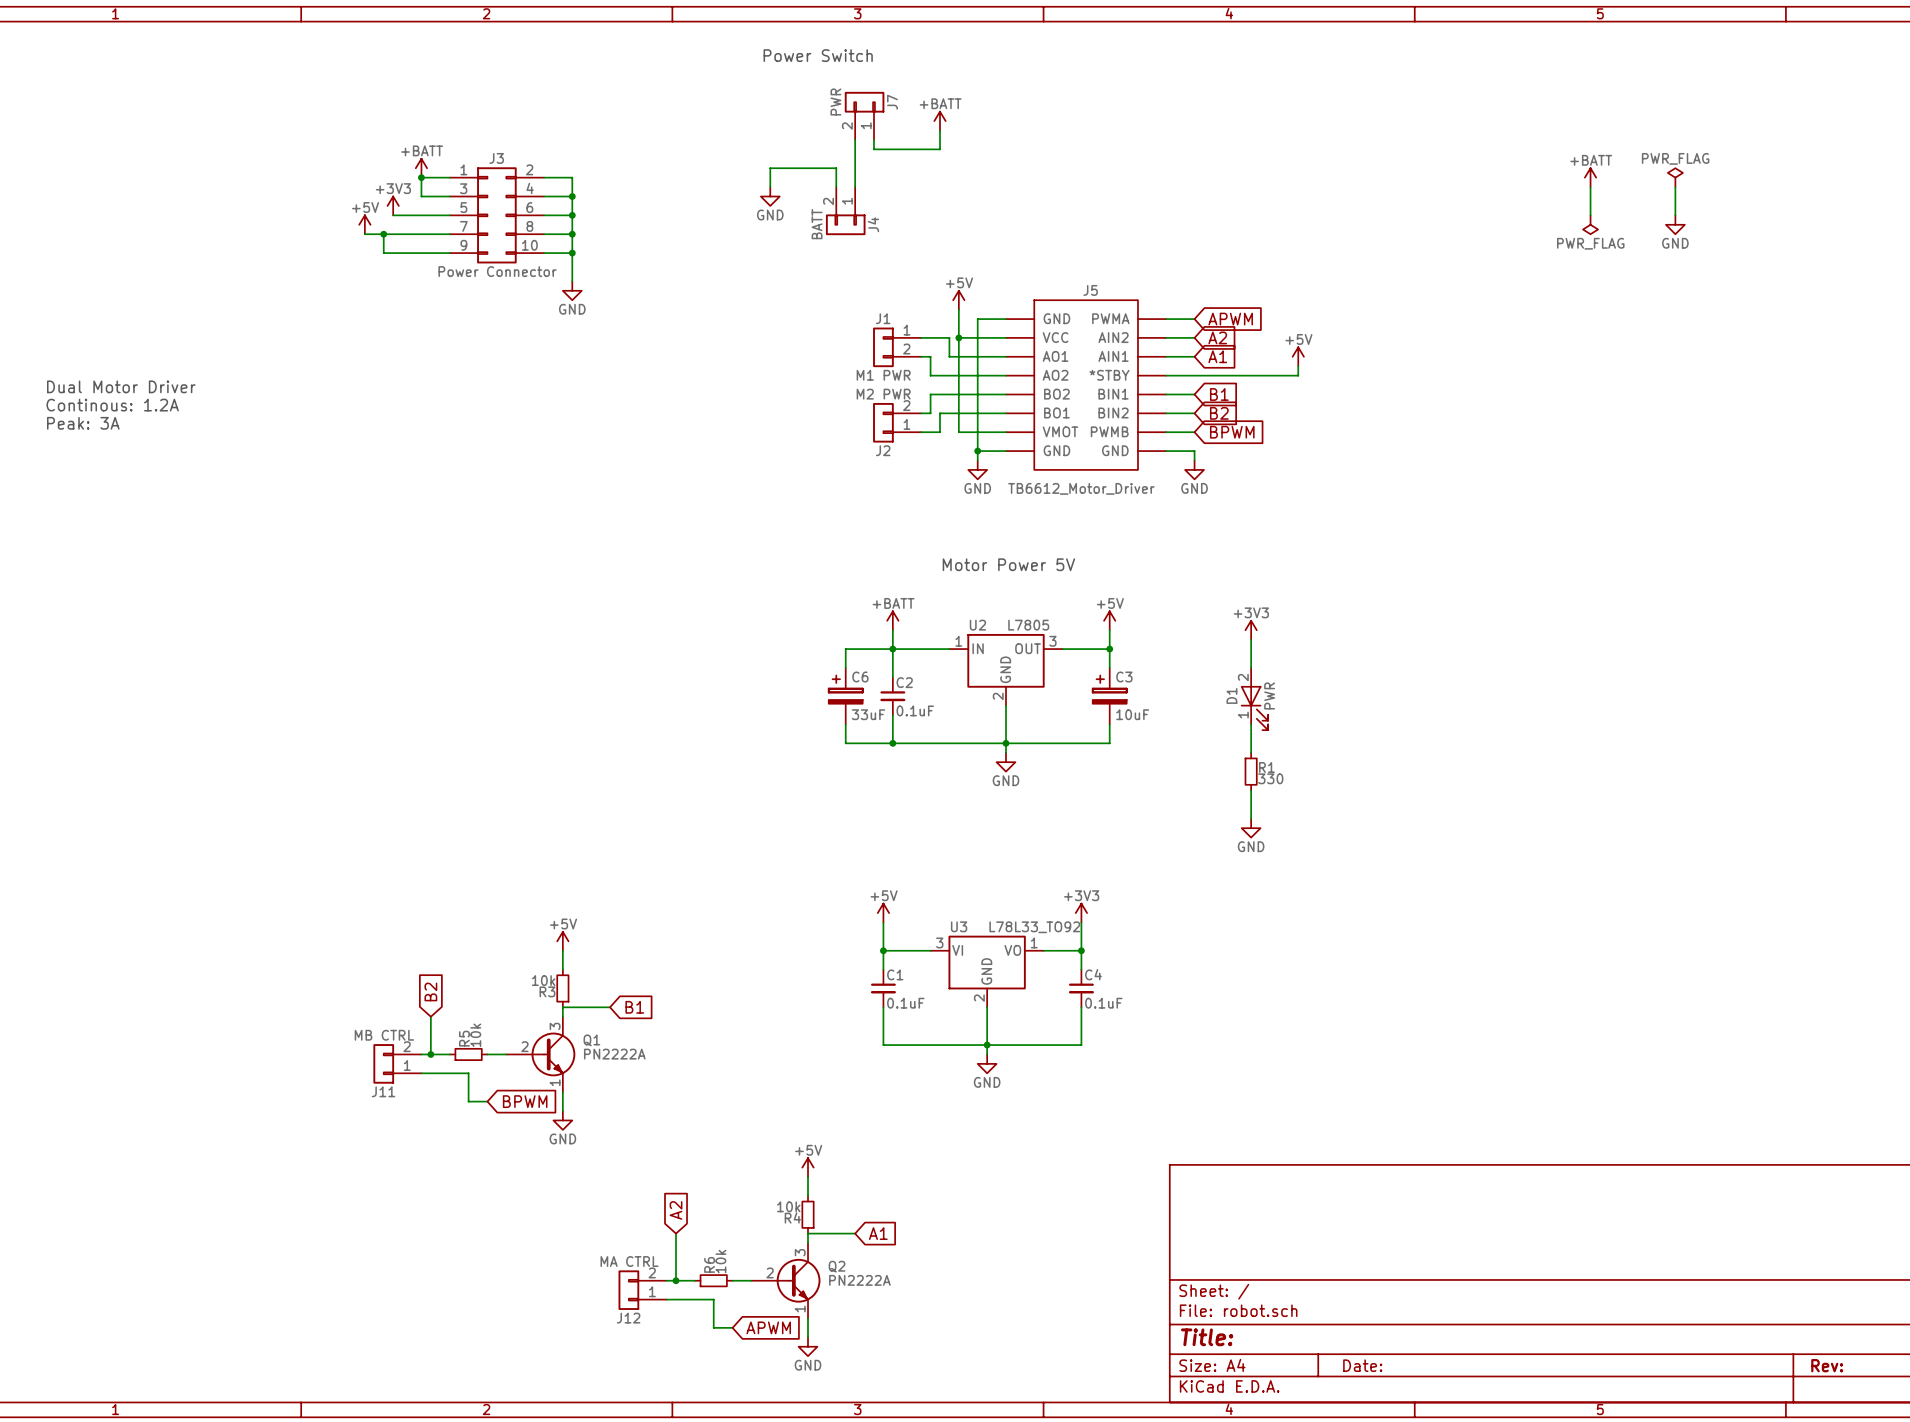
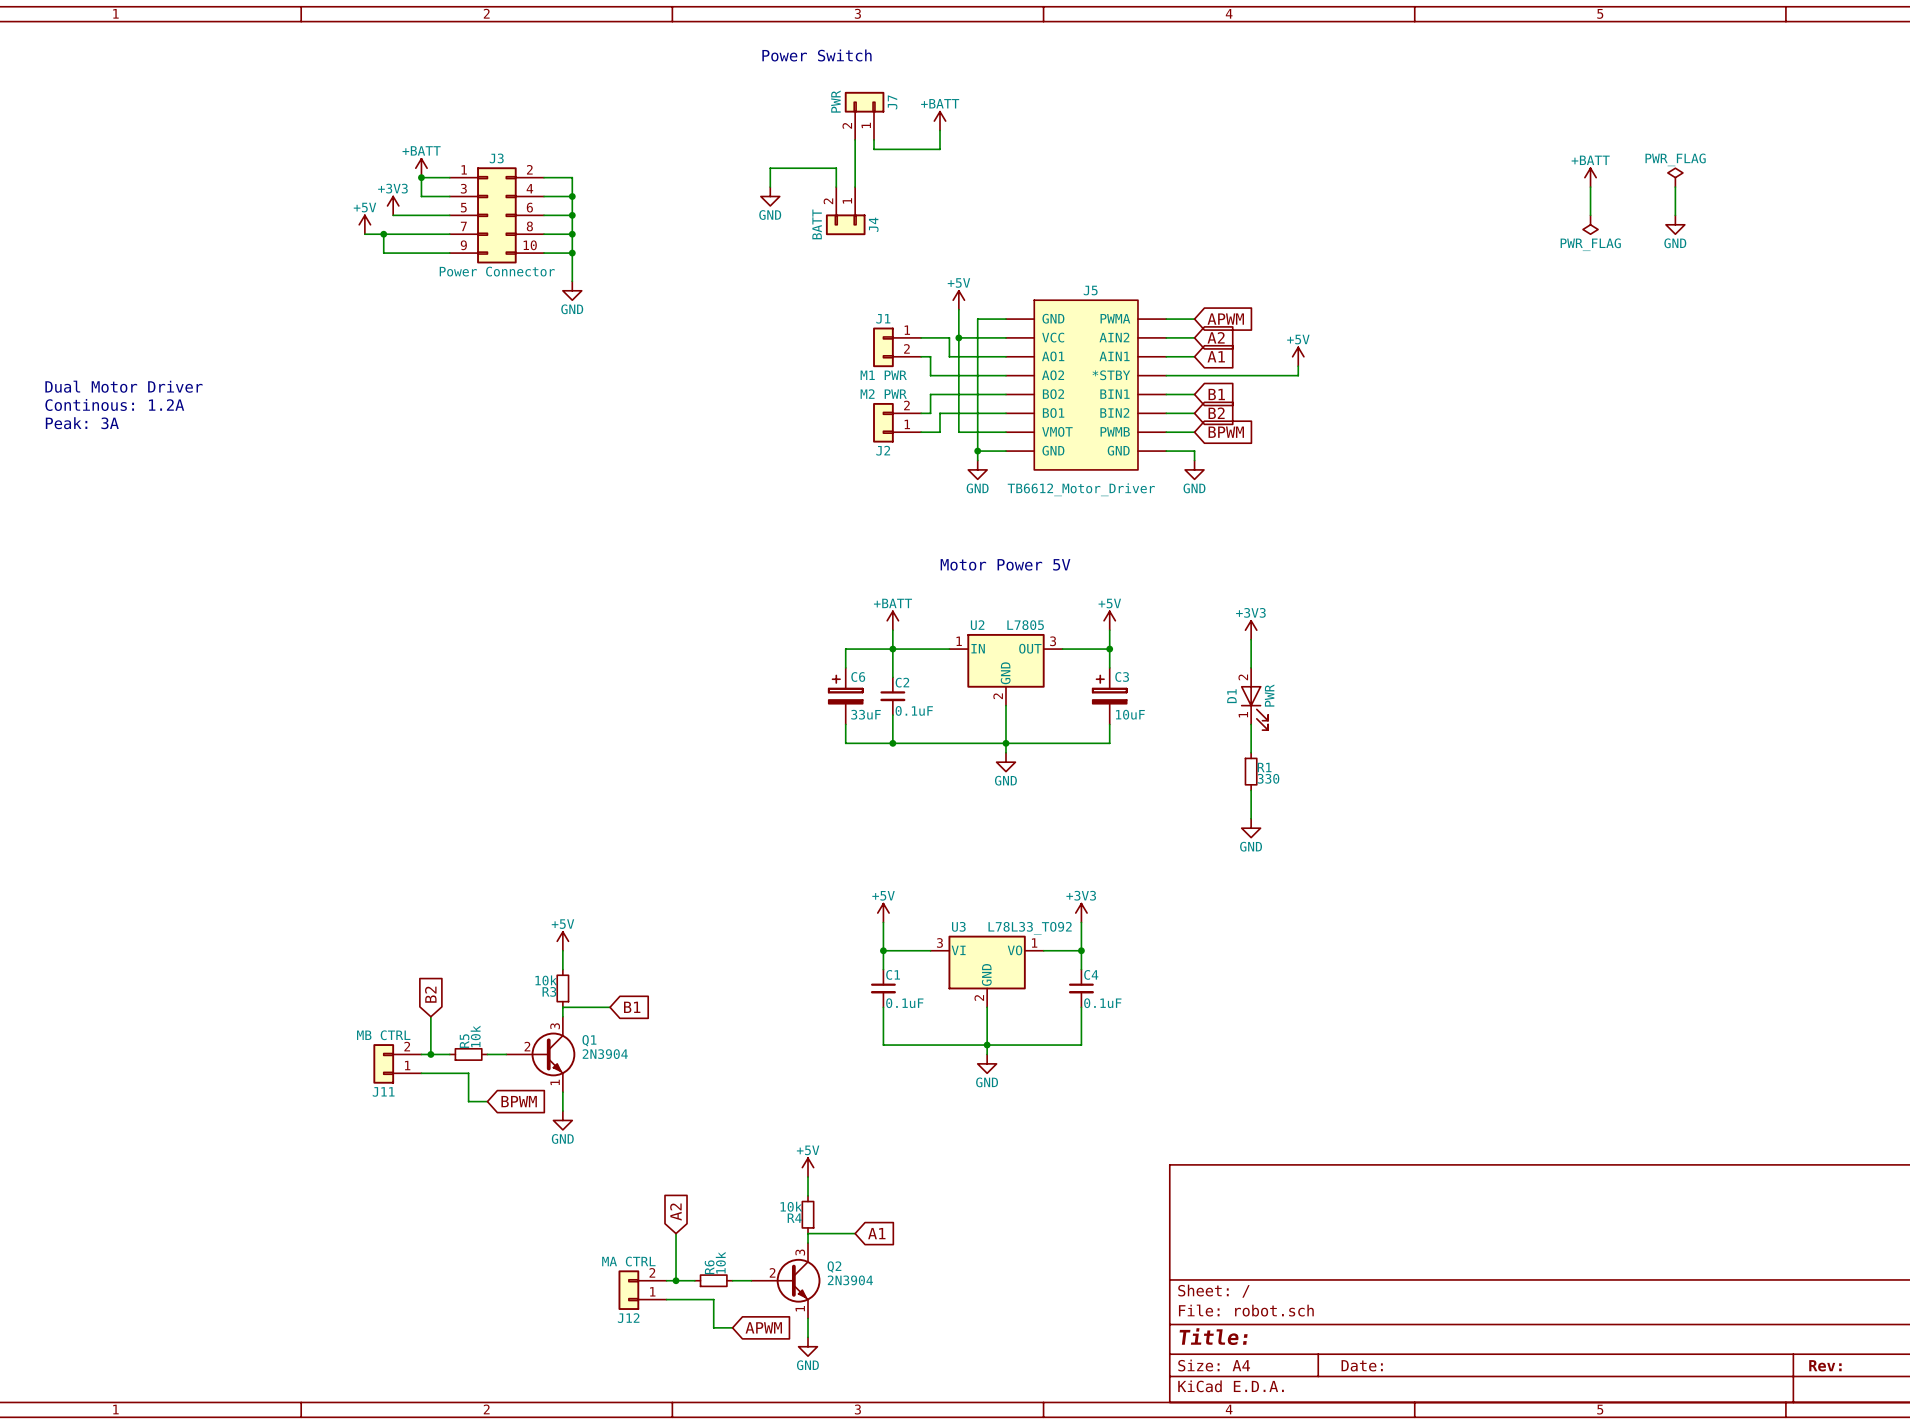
Q1 symbol: [506, 1016, 576, 1093] -> [506, 1016, 576, 1093]
Q1 value: PN2222A (614, 1054) -> 2N3904 (605, 1054)
Q2 symbol: [751, 1243, 821, 1319] -> [751, 1243, 821, 1319]
Q2 value: PN2222A (859, 1280) -> 2N3904 (850, 1280)

